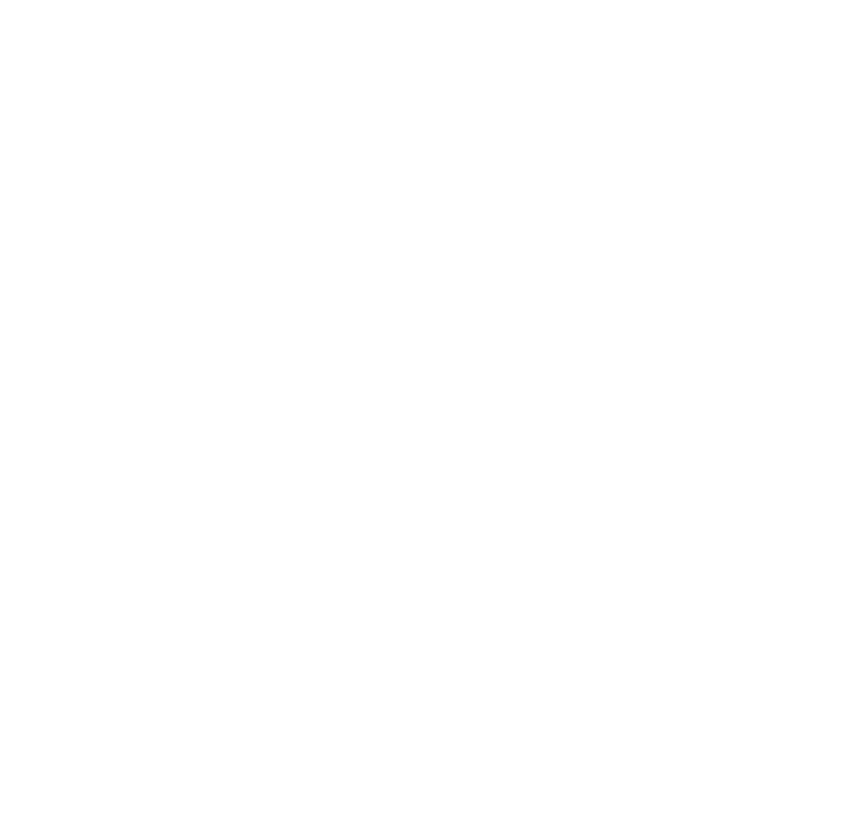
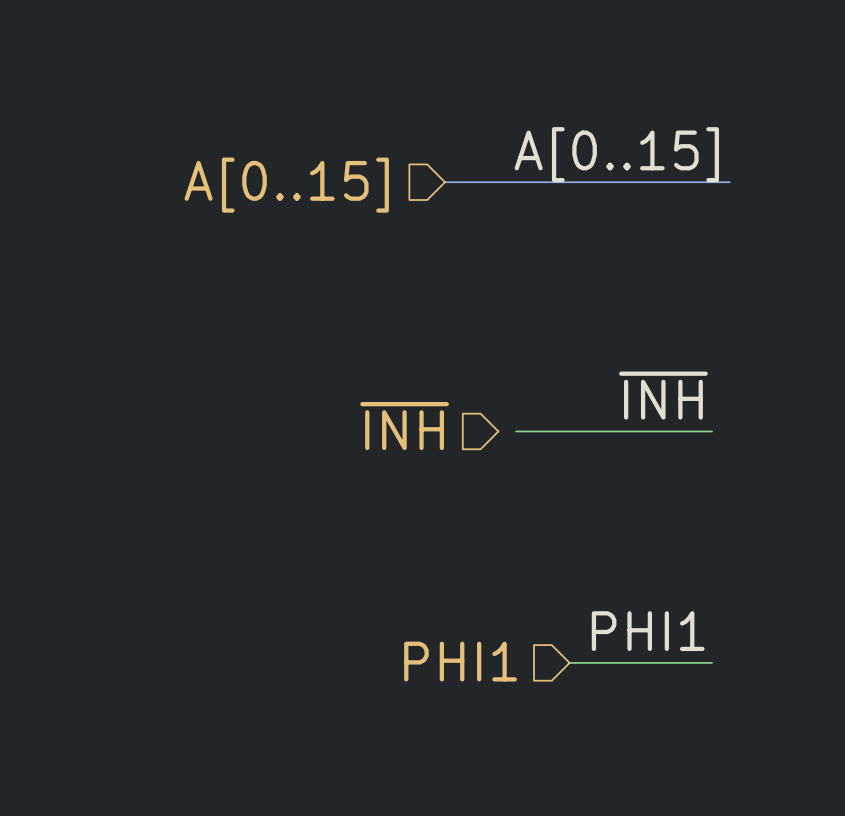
label: none -> A[0..15] (616, 154)
bus: none -> (444, 182) (729, 182)
hierarchical label: none -> A[0..15] (286, 185)
label: none -> ~{INH} (663, 395)
hierarchical label: none -> ~{INH} (404, 426)
wire: none -> (516, 431) (712, 431)
label: none -> PHI1 (648, 631)
hierarchical label: none -> PHI1 (460, 661)
wire: none -> (569, 662) (712, 662)

